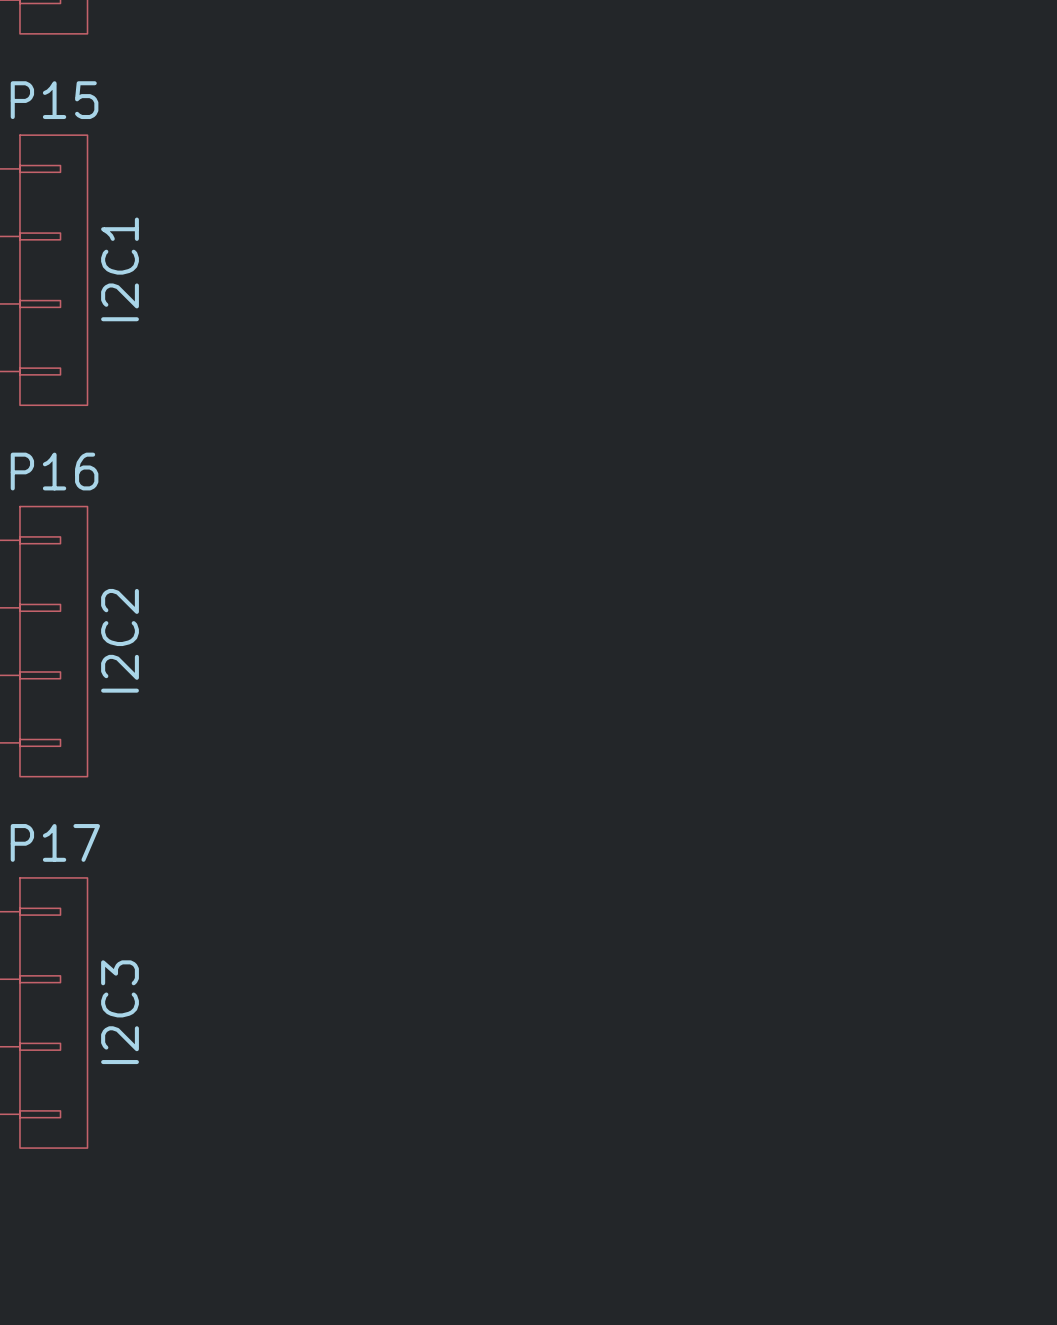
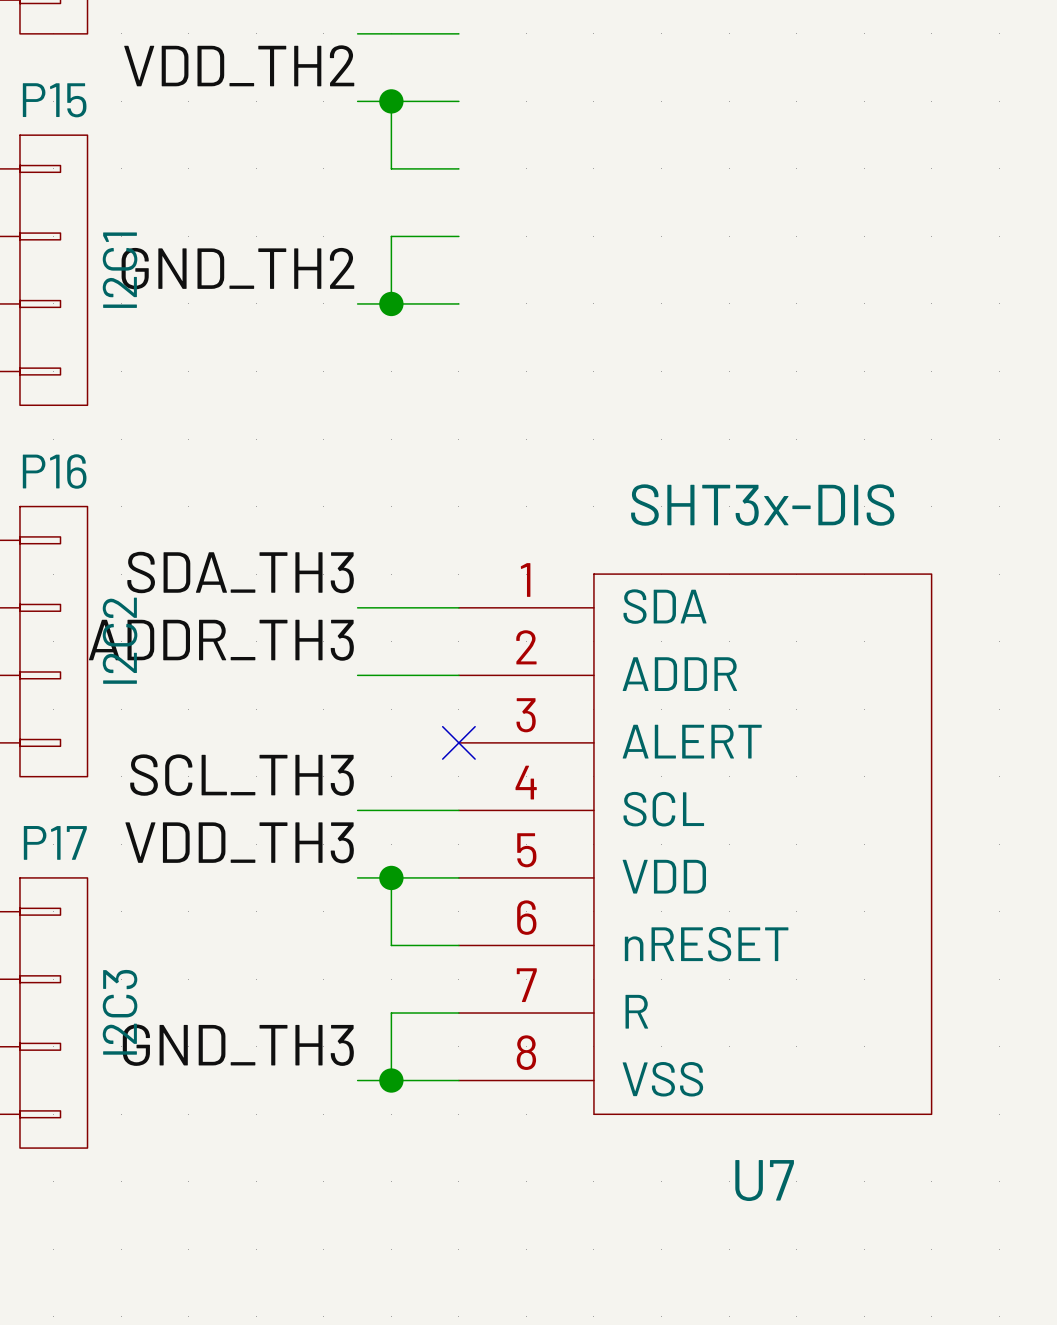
wire: none -> (357, 33) (458, 33)
label: none -> VDD_TH2 (239, 65)
wire: none -> (357, 101) (458, 101)
wire: none -> (391, 101) (391, 168) (458, 168)
junction: none -> (391, 101)
wire: none -> (458, 236) (391, 236) (391, 303)
label: none -> GND_TH2 (237, 268)
wire: none -> (357, 303) (458, 303)
junction: none -> (391, 303)
label: none -> SDA_TH3 (240, 572)
wire: none -> (357, 607) (458, 607)
label: none -> ADDR_TH3 (221, 640)
wire: none -> (357, 675) (458, 675)
no-connect mark: none -> (458, 742)
label: none -> SCL_TH3 (242, 775)
wire: none -> (357, 810) (458, 810)
label: none -> VDD_TH3 (239, 842)
U7: none -> SHT3x-DIS (695, 844)
wire: none -> (357, 877) (458, 877)
wire: none -> (391, 877) (391, 945) (458, 945)
junction: none -> (391, 877)
wire: none -> (458, 1013) (391, 1013) (391, 1080)
label: none -> GND_TH3 (238, 1045)
wire: none -> (357, 1080) (458, 1080)
junction: none -> (391, 1080)

